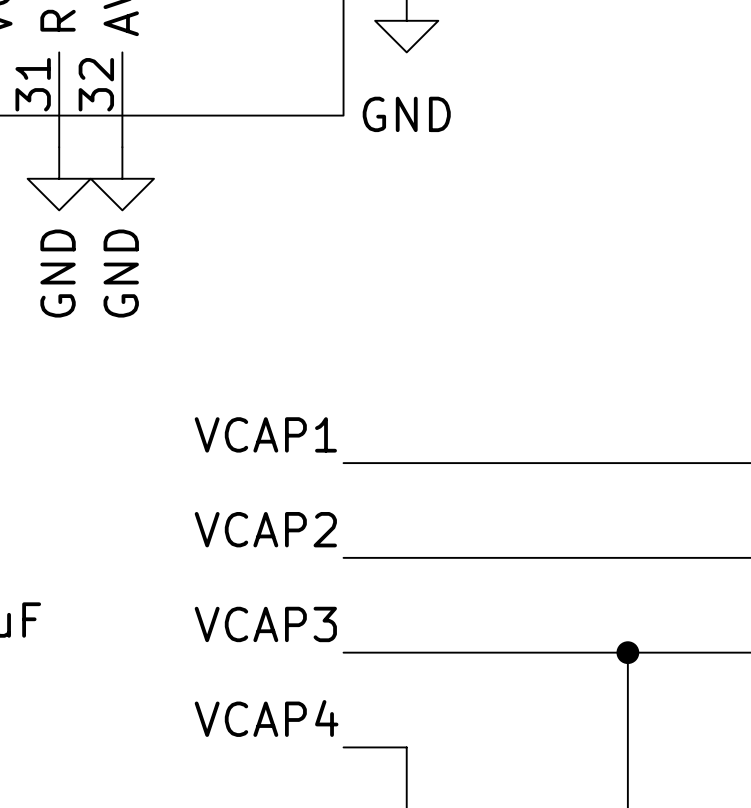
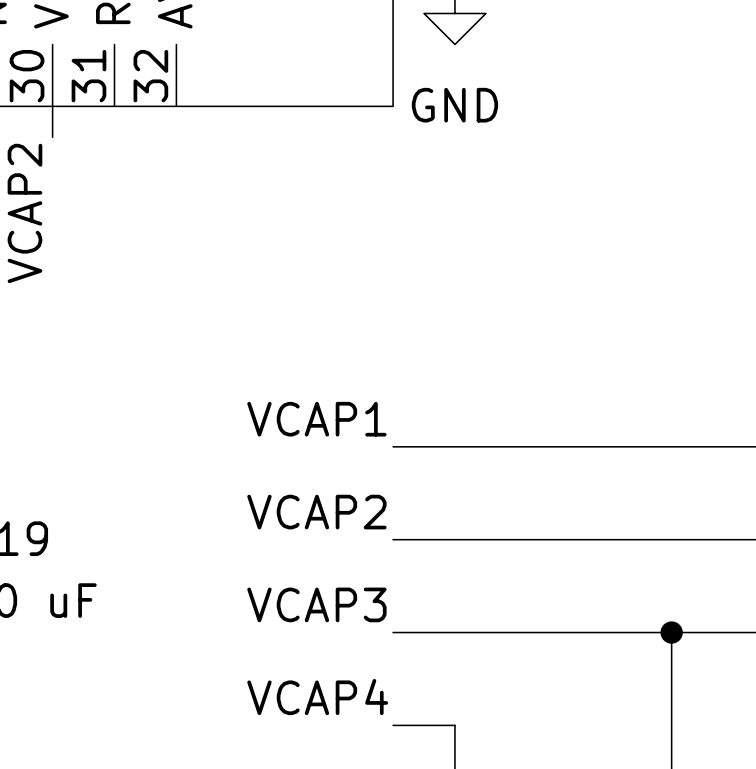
wire: (59, 115) (59, 147) -> none
wire: (122, 115) (122, 147) -> none
power symbol: GND (59, 178) -> none
power symbol: GND (122, 178) -> none

